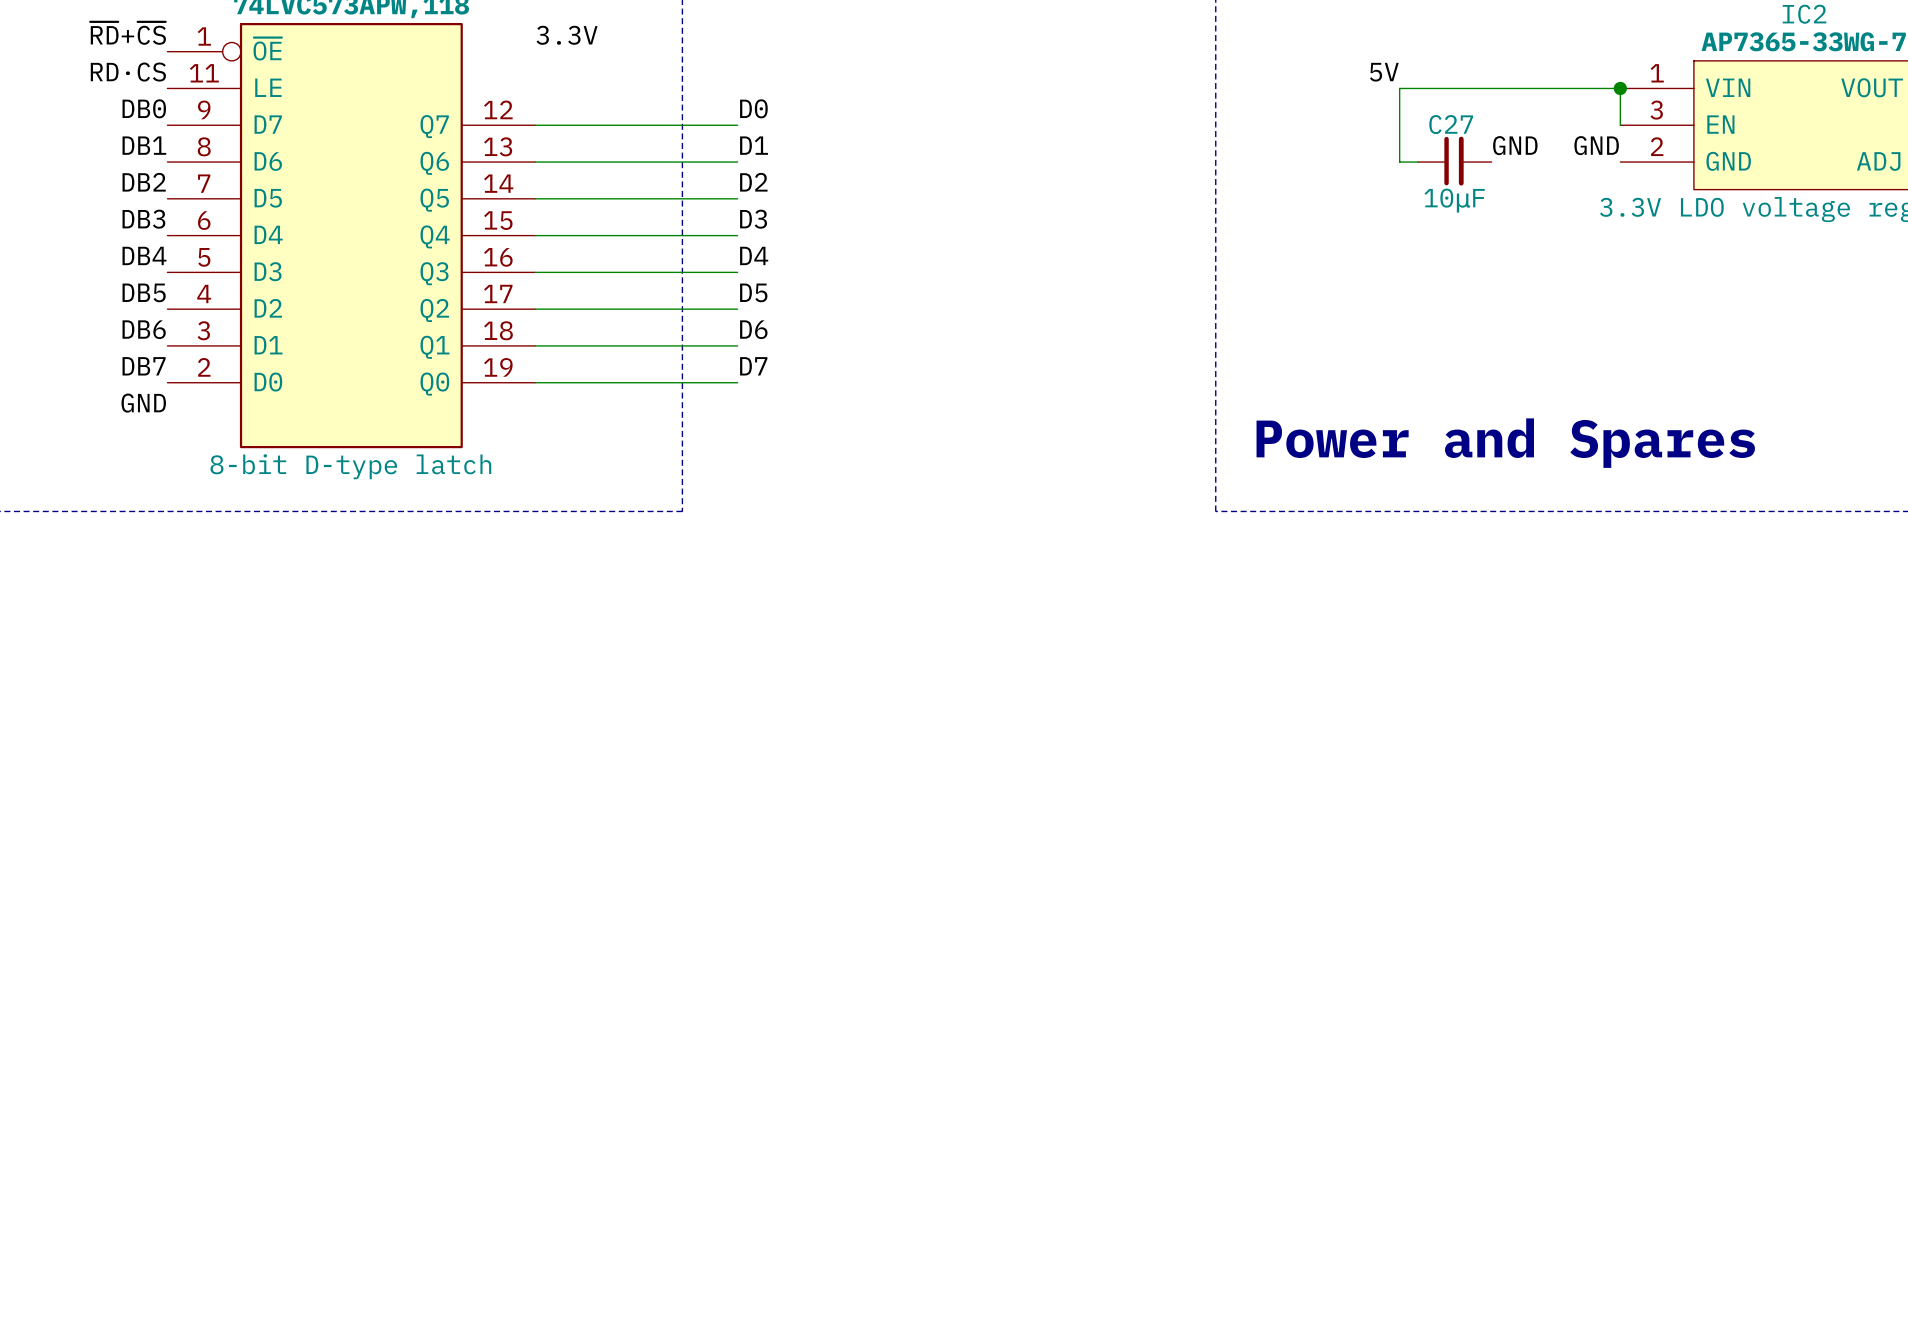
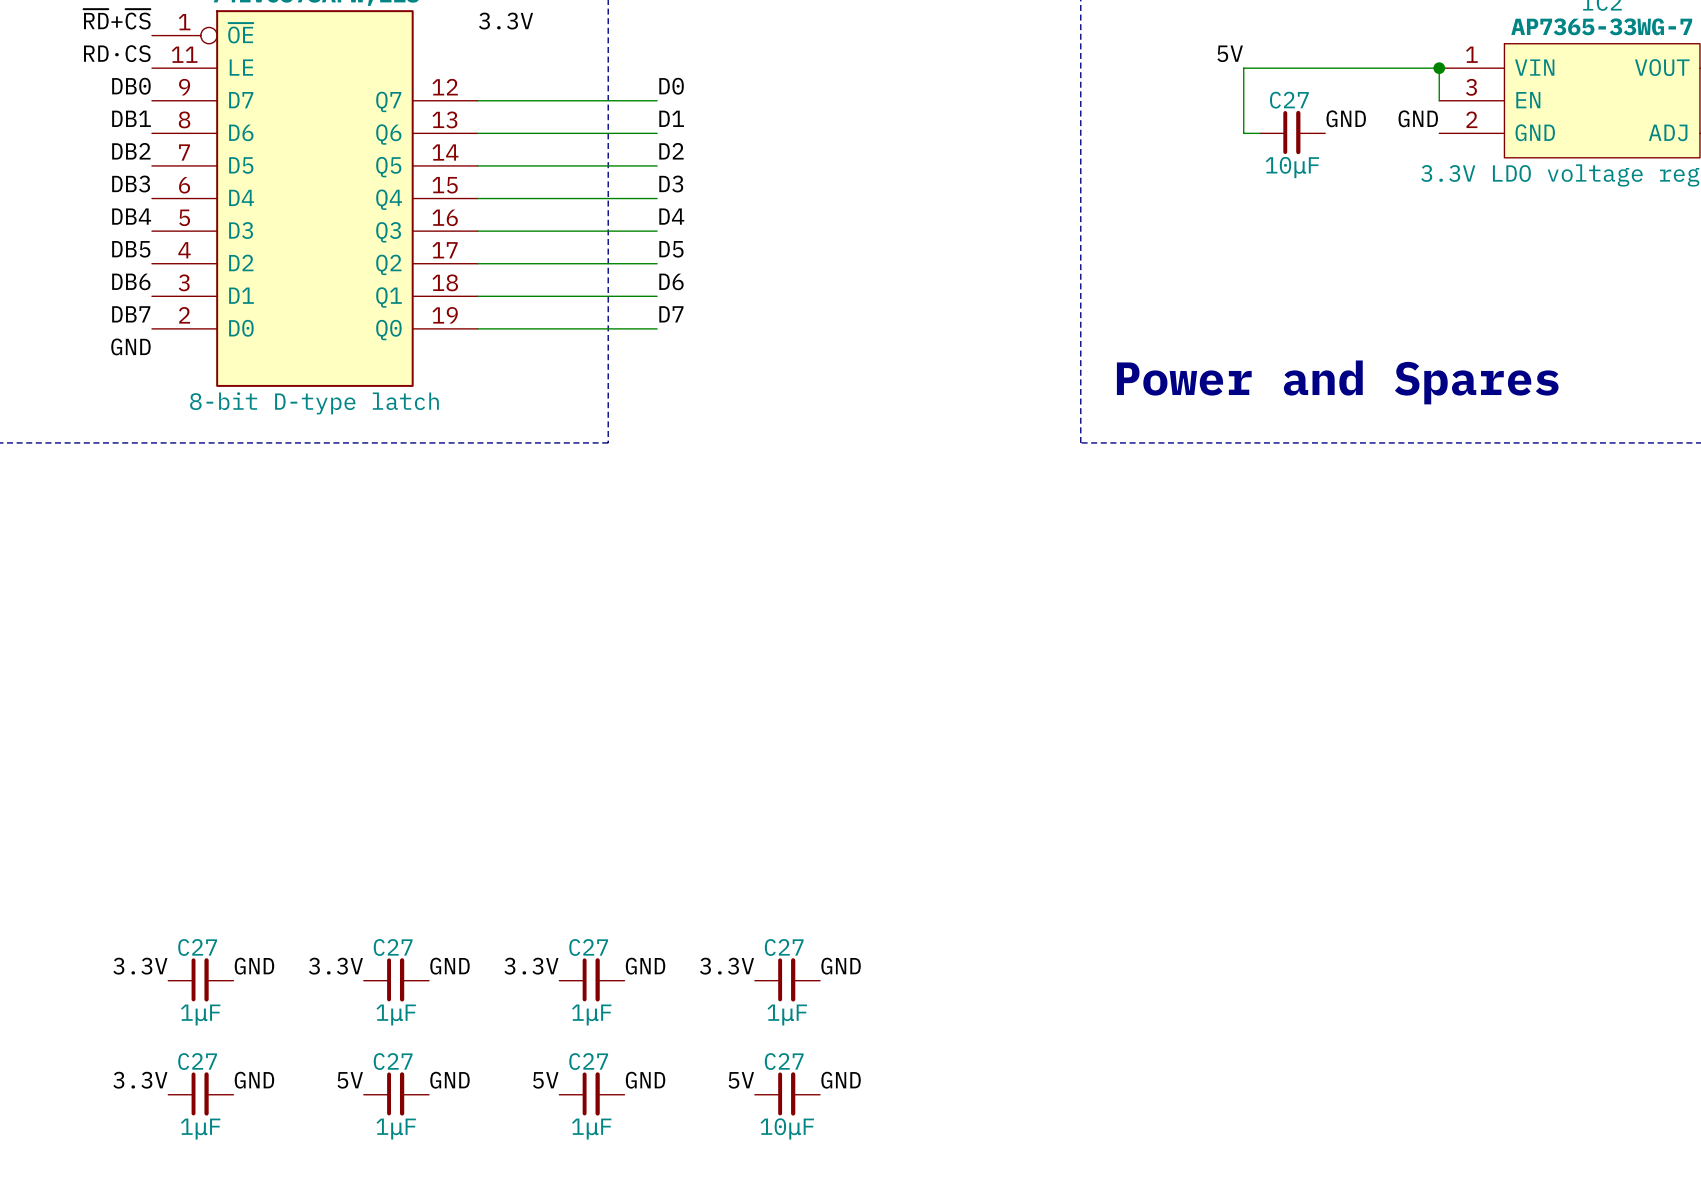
label: none -> 3.3V (140, 966)
label: none -> GND (254, 966)
label: none -> 3.3V (335, 966)
label: none -> GND (449, 966)
label: none -> 3.3V (531, 966)
label: none -> GND (645, 966)
label: none -> 3.3V (727, 966)
label: none -> GND (841, 966)
C27: none -> 1μF (200, 979)
C27: none -> 1μF (396, 979)
C27: none -> 1μF (591, 979)
C27: none -> 1μF (787, 979)
label: none -> 3.3V (140, 1080)
label: none -> GND (254, 1080)
label: none -> 5V (350, 1080)
label: none -> GND (449, 1080)
label: none -> 5V (545, 1080)
label: none -> GND (645, 1080)
label: none -> 5V (741, 1080)
label: none -> GND (841, 1080)
C27: none -> 1μF (200, 1093)
C27: none -> 1μF (396, 1093)
C27: none -> 1μF (591, 1093)
C27: none -> 10μF (787, 1093)

